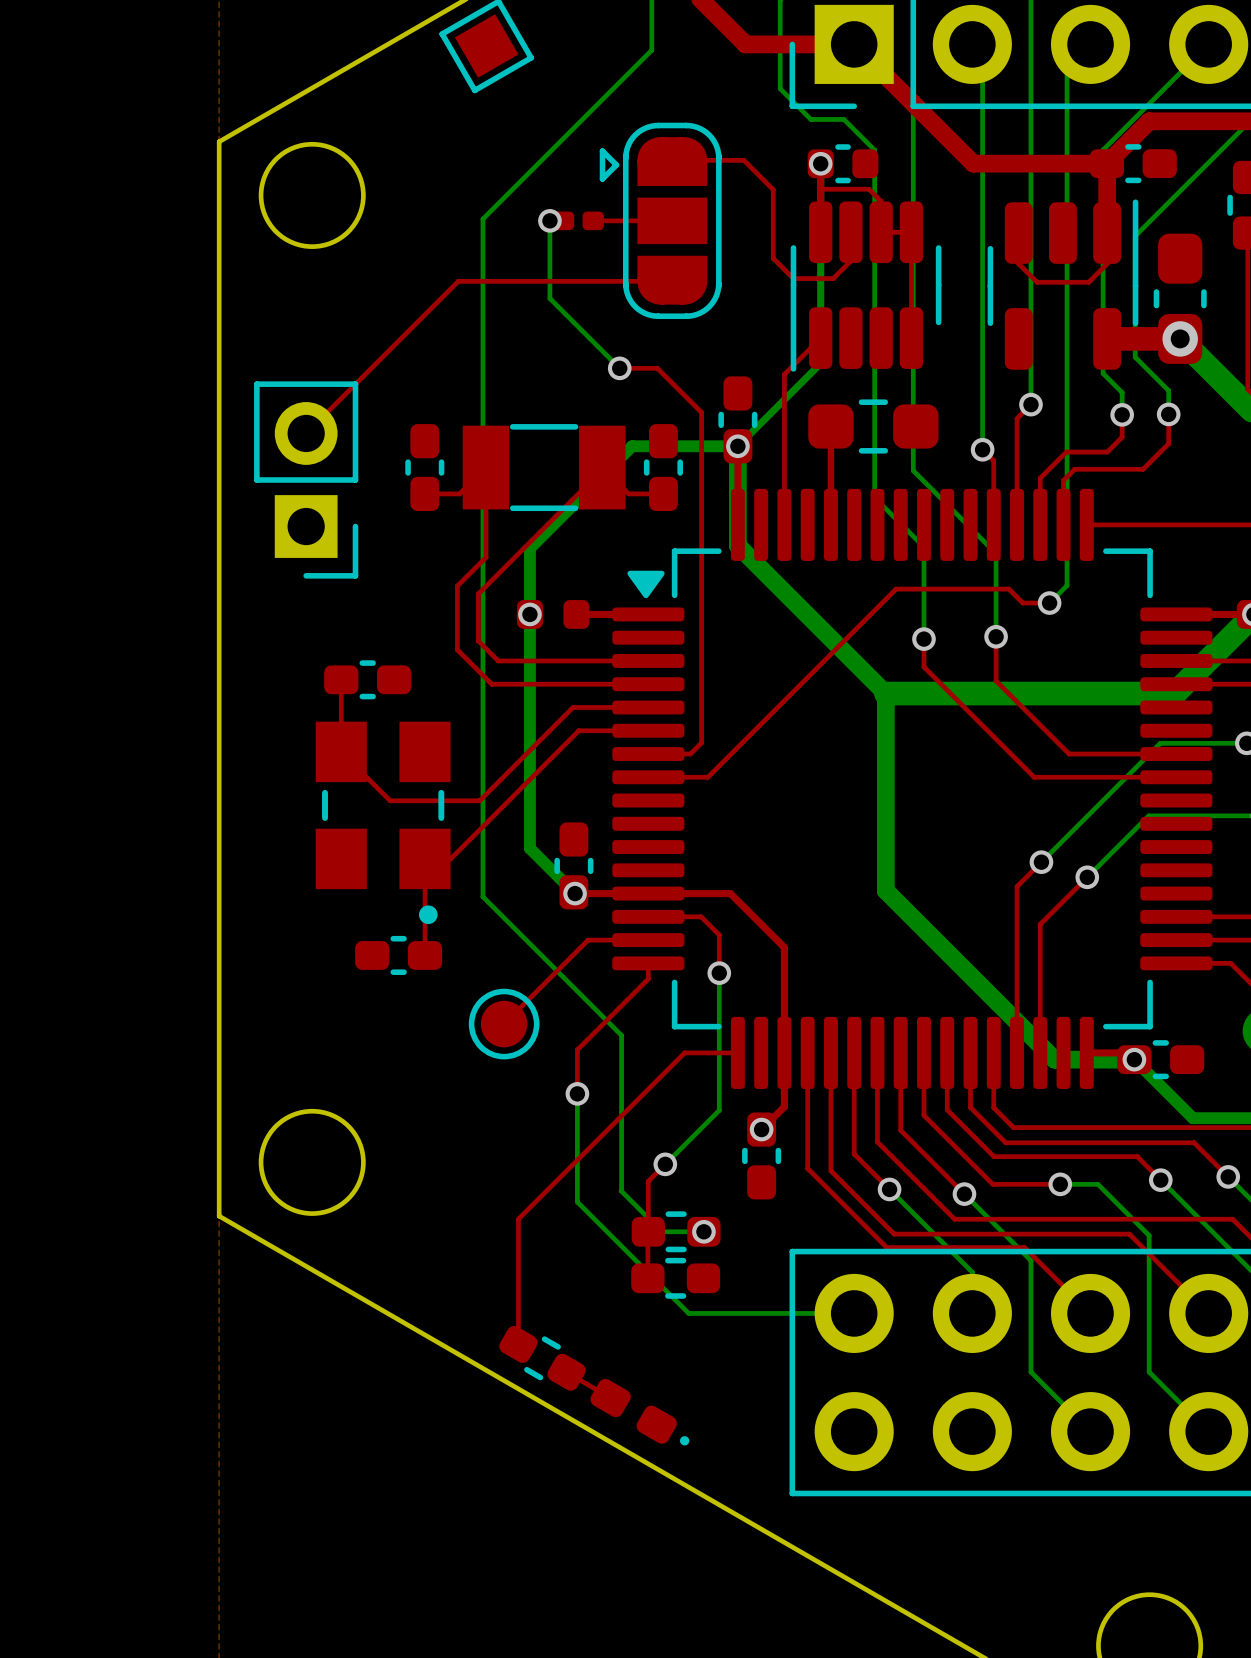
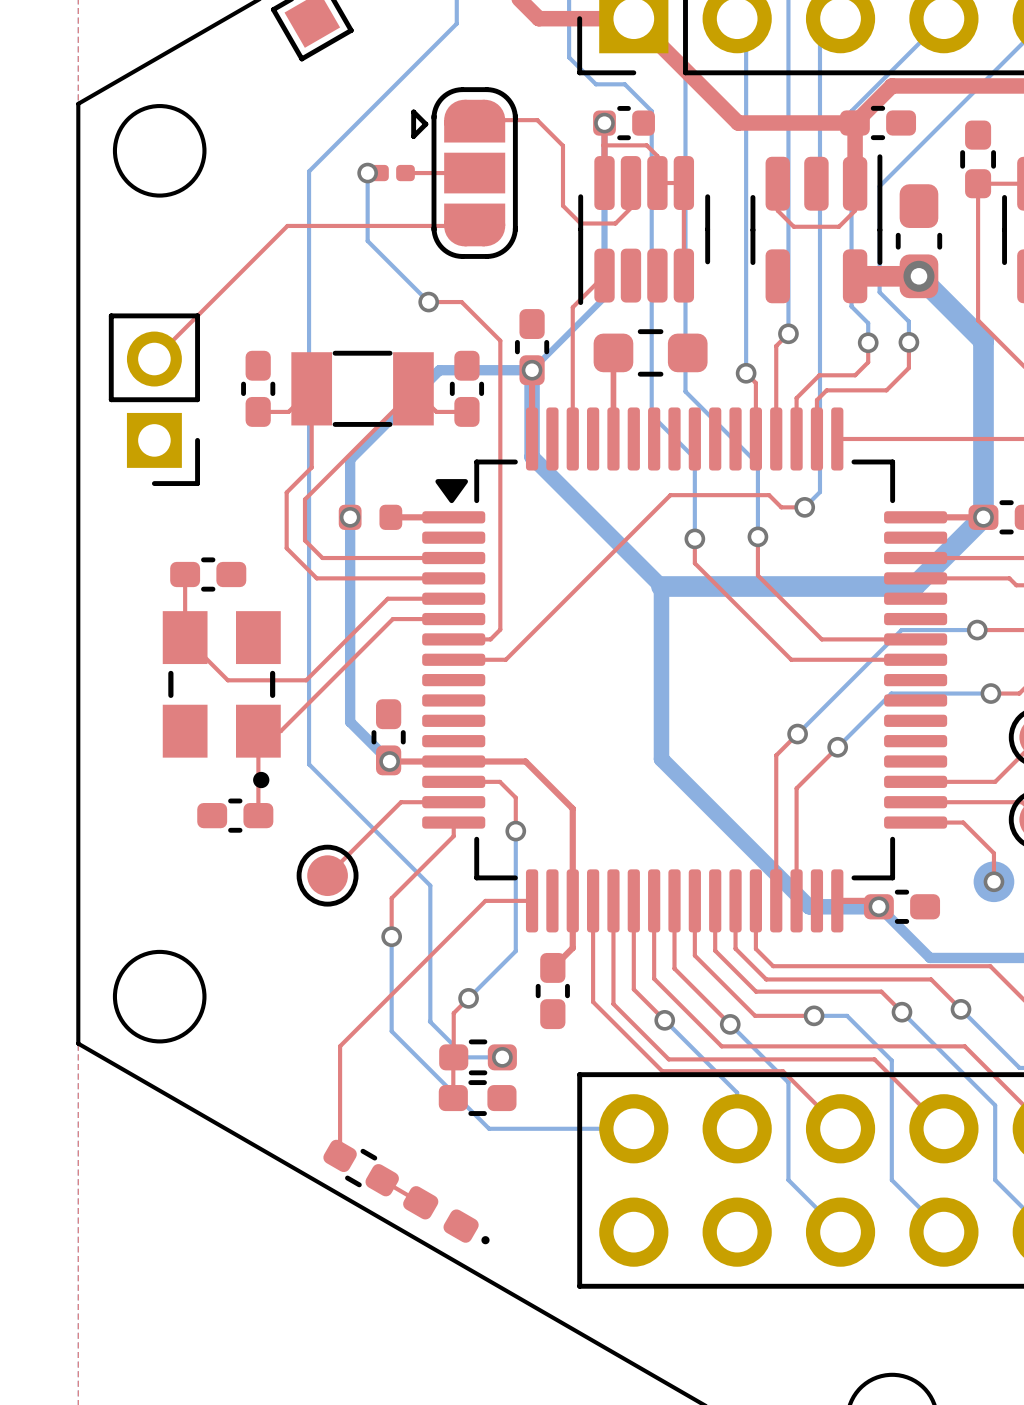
via: (761, 1129) -> none

